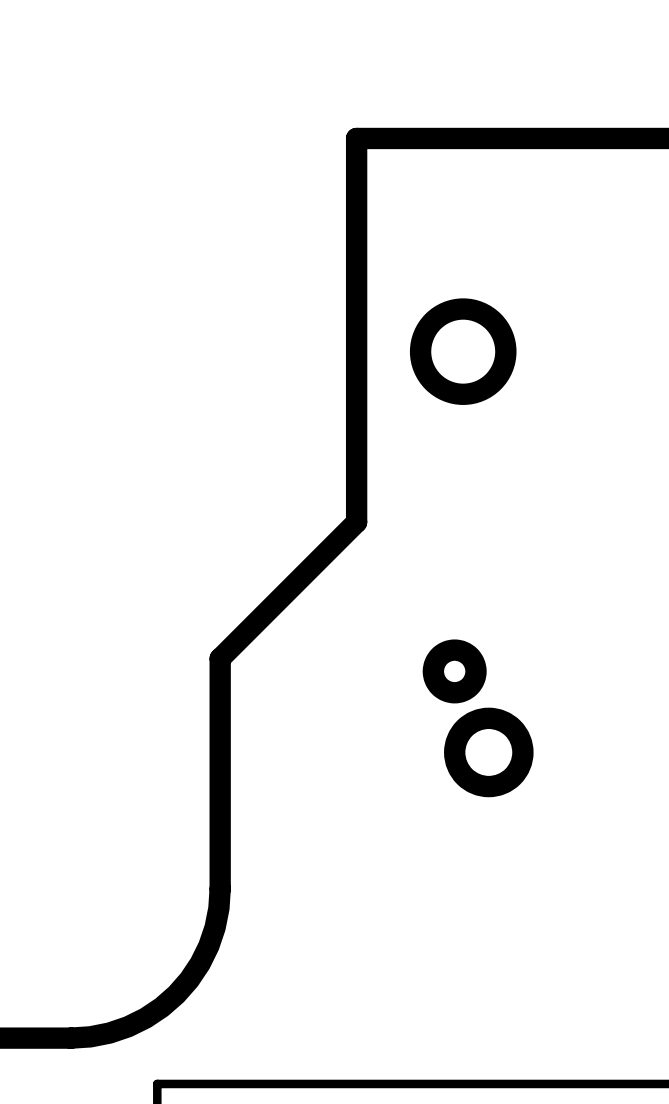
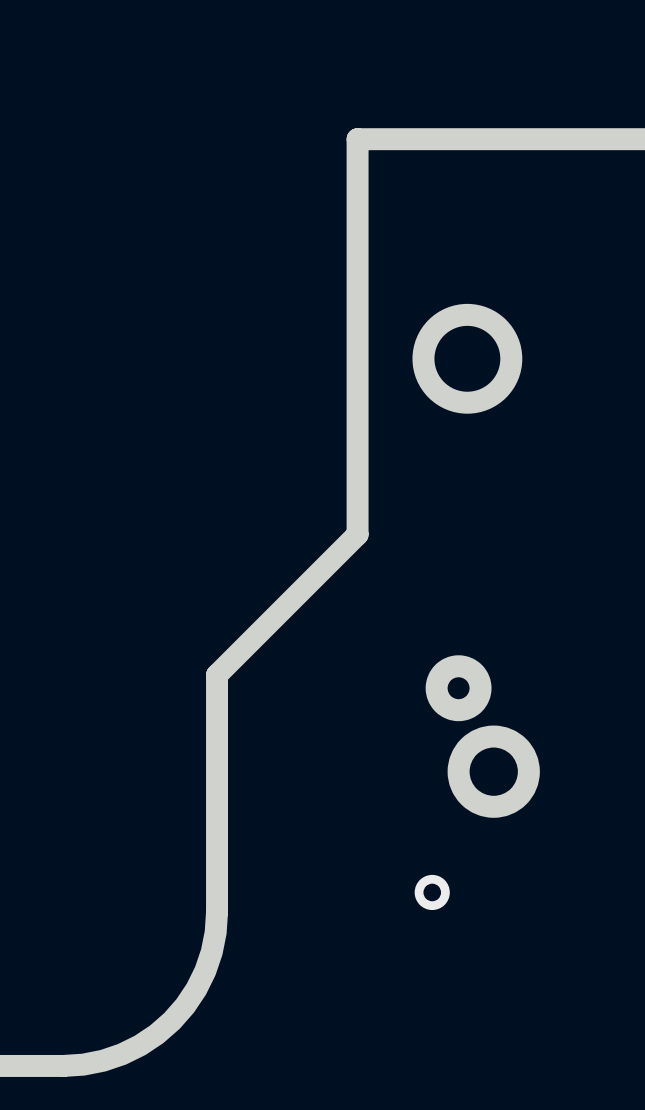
via: none -> (432, 892)

